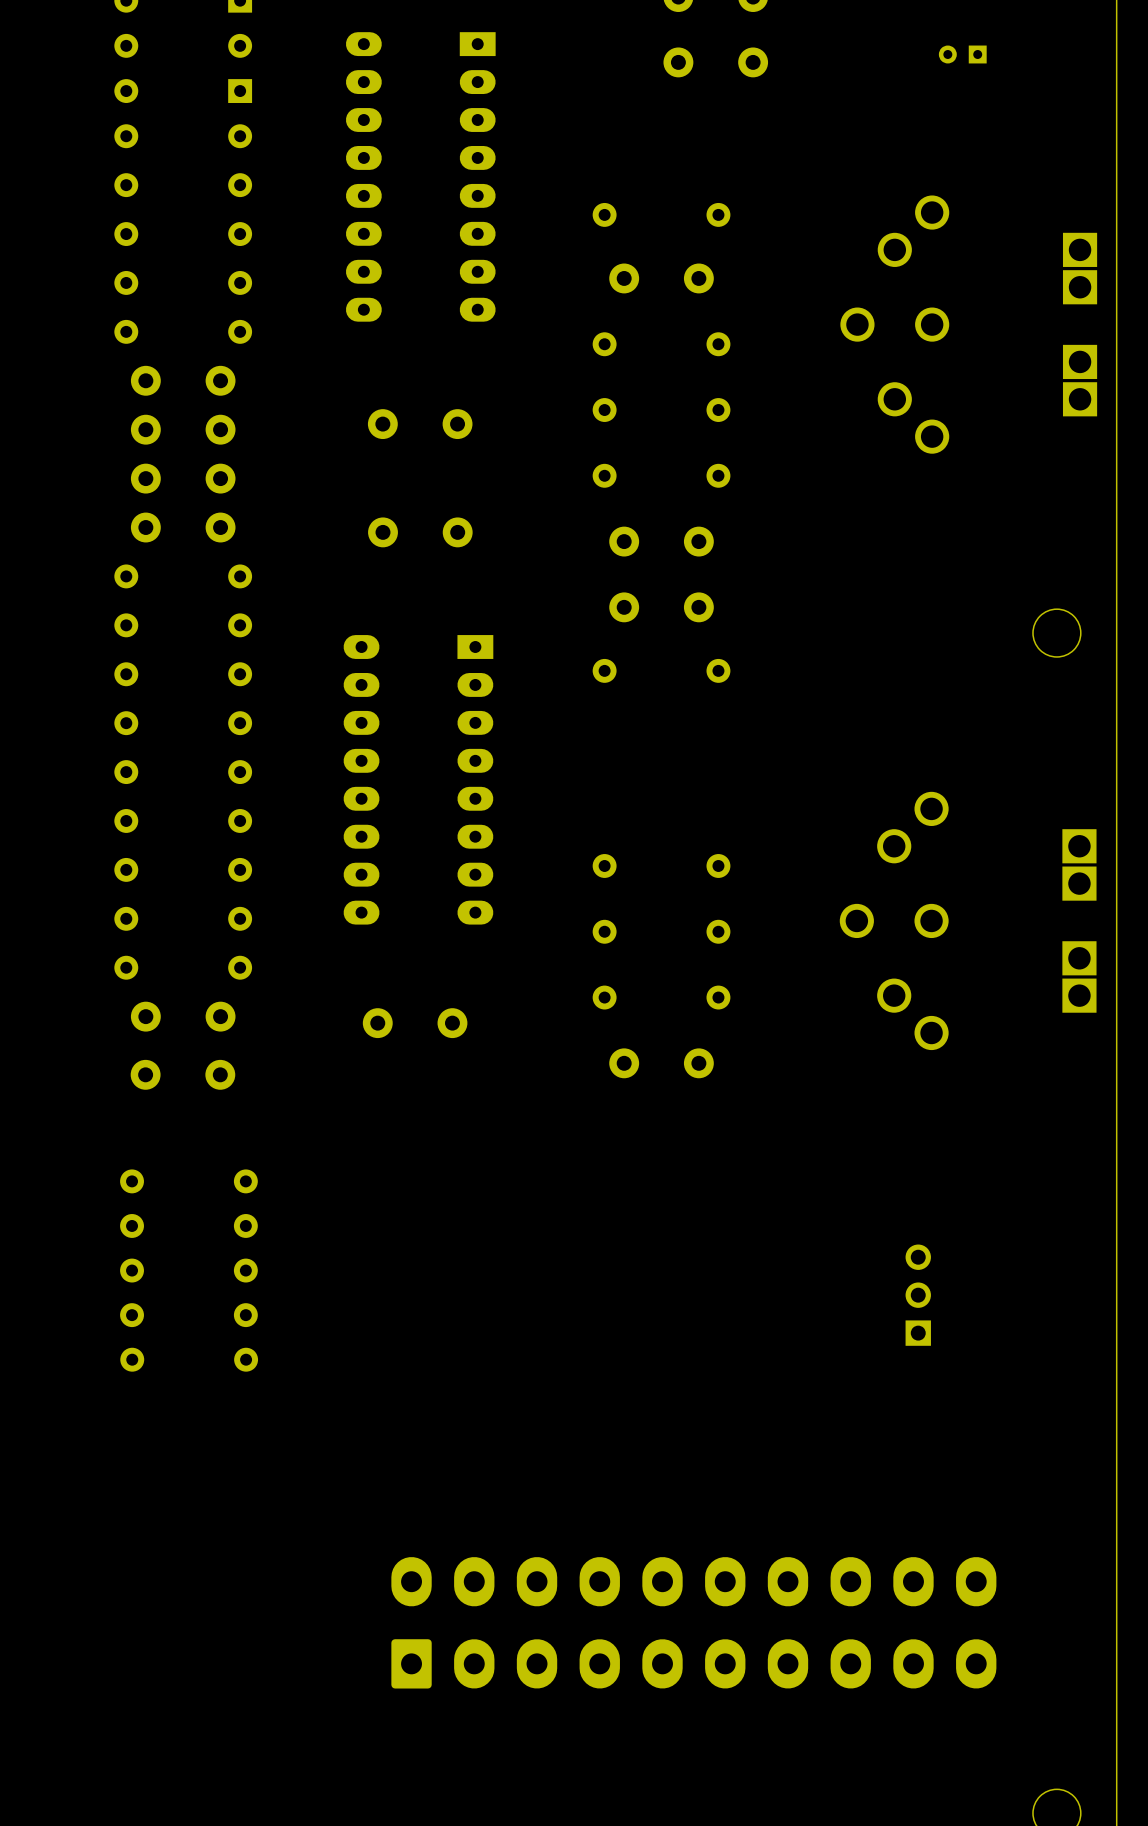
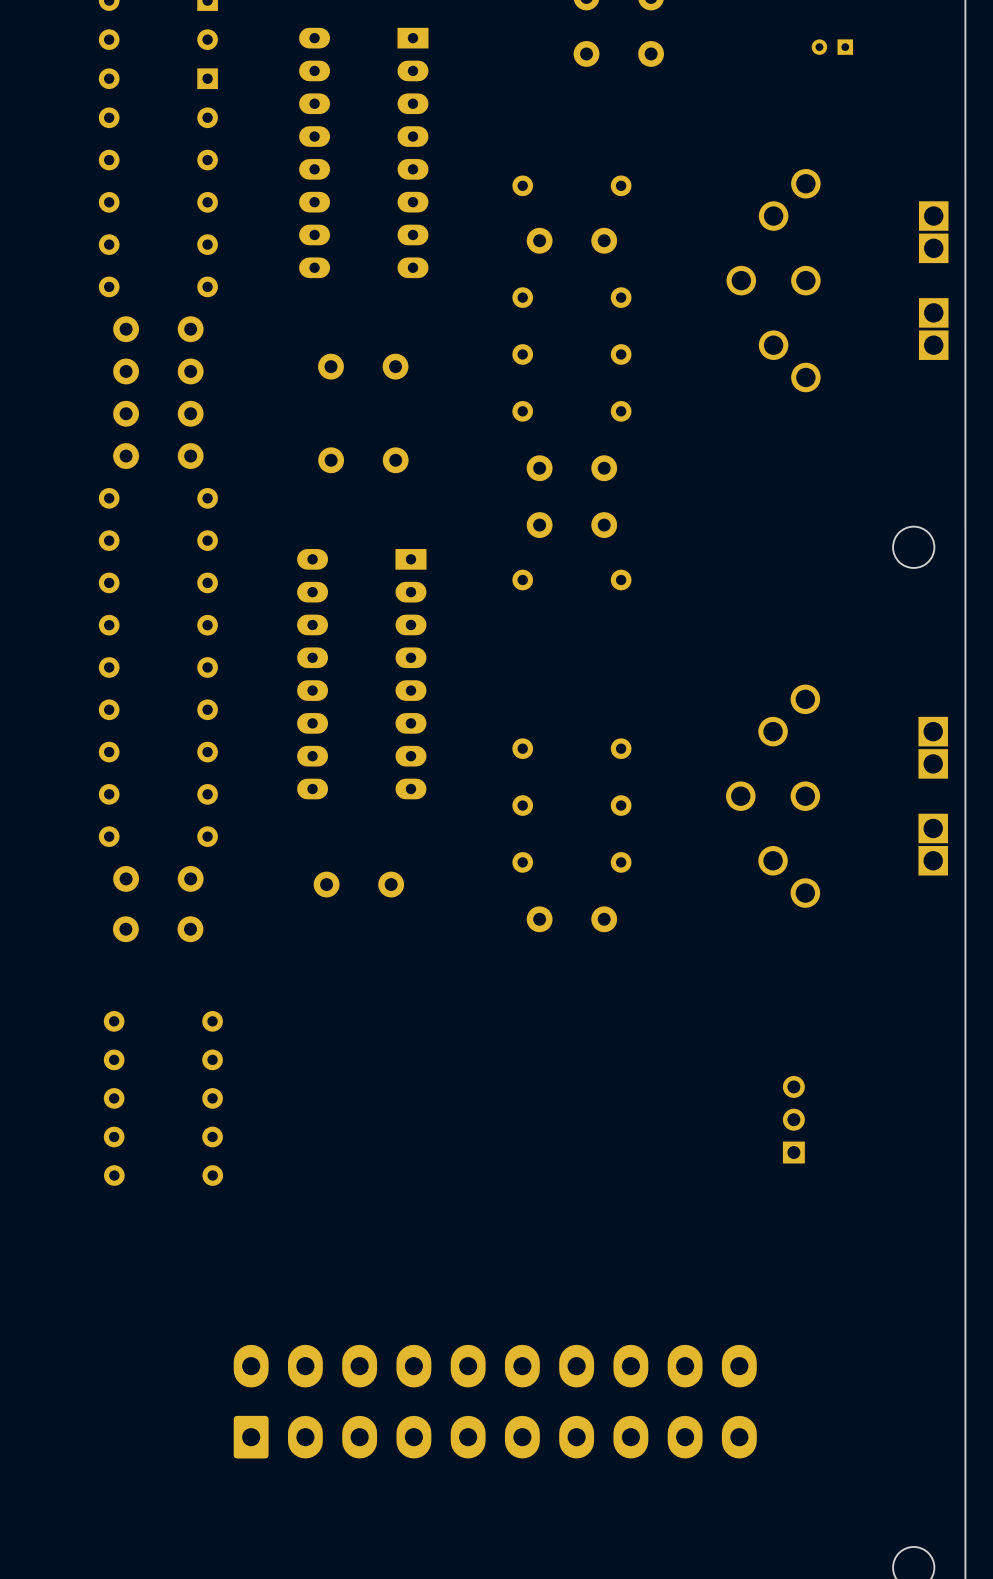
part position: (693, 1622) -> (495, 1401)

